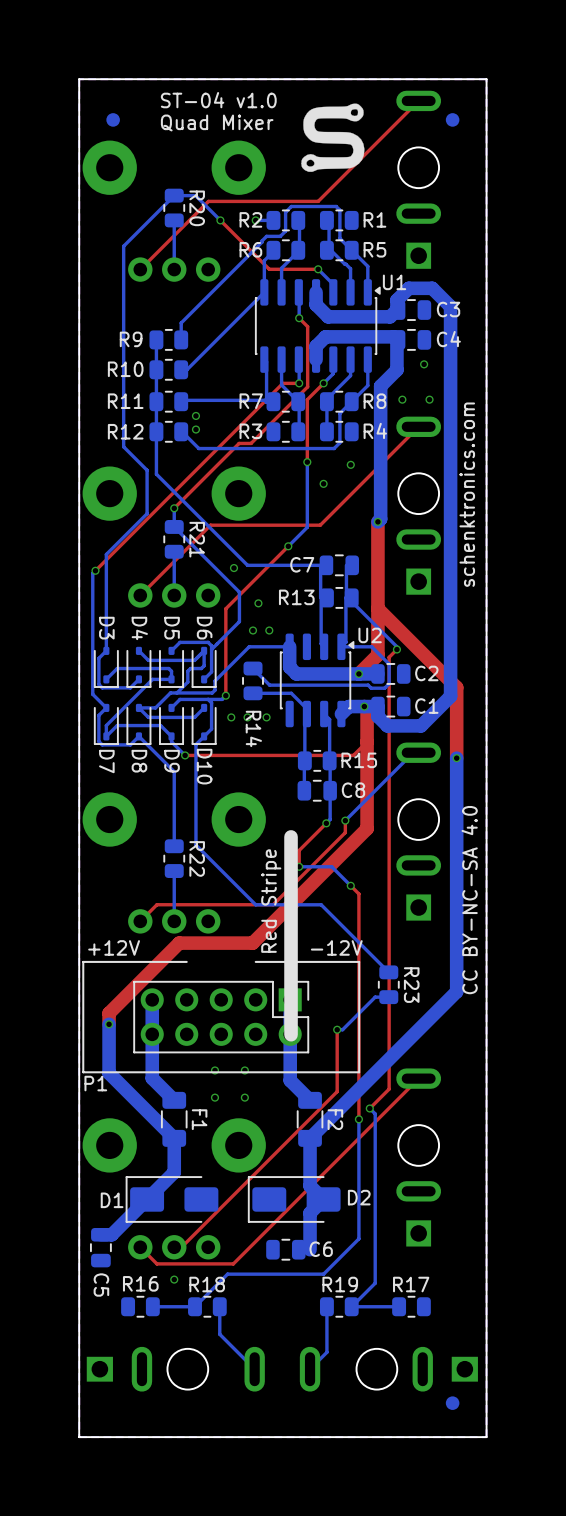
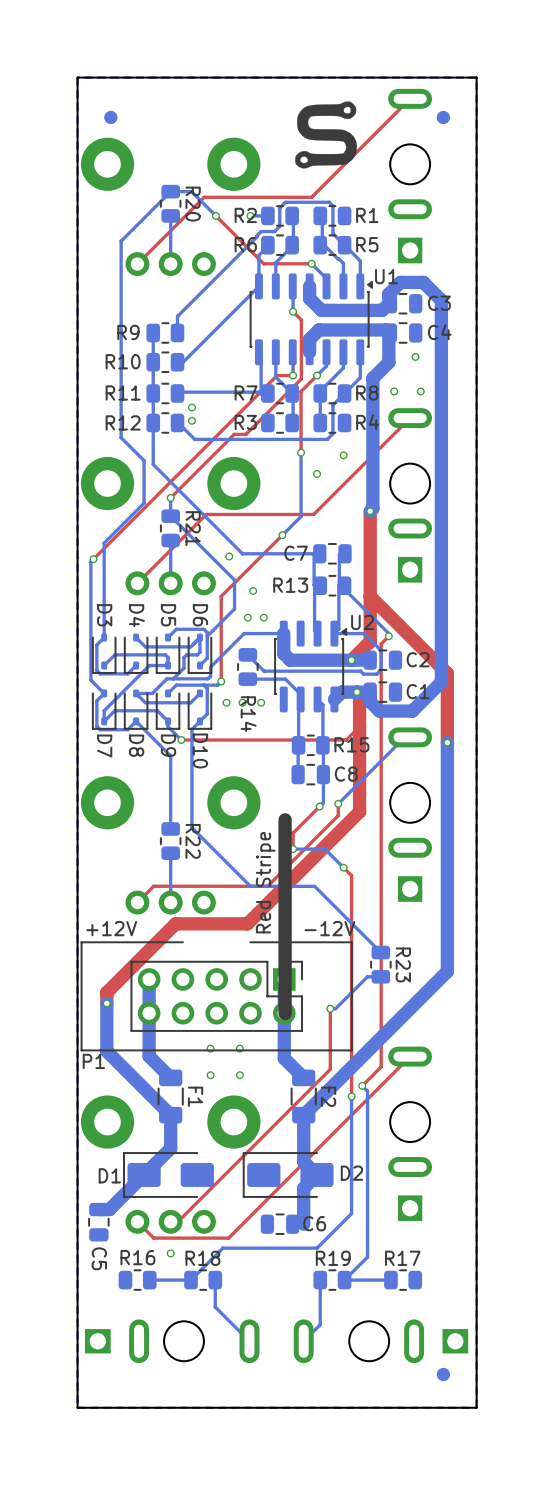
text: ST-04 v1.0 (218, 100) -> none
text: Quad Mixer (217, 122) -> none
text: schenktronics.com (467, 494) -> none
text: CC BY-NC-SA 4.0 (469, 900) -> none

